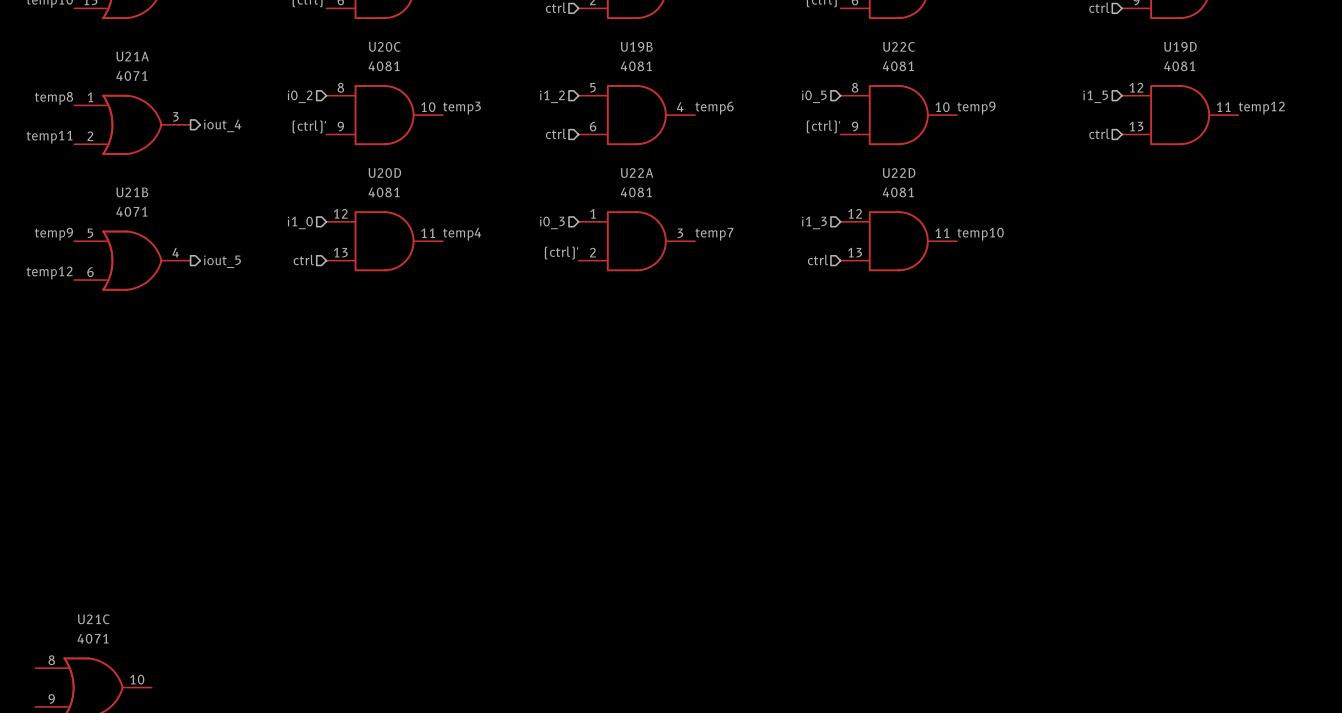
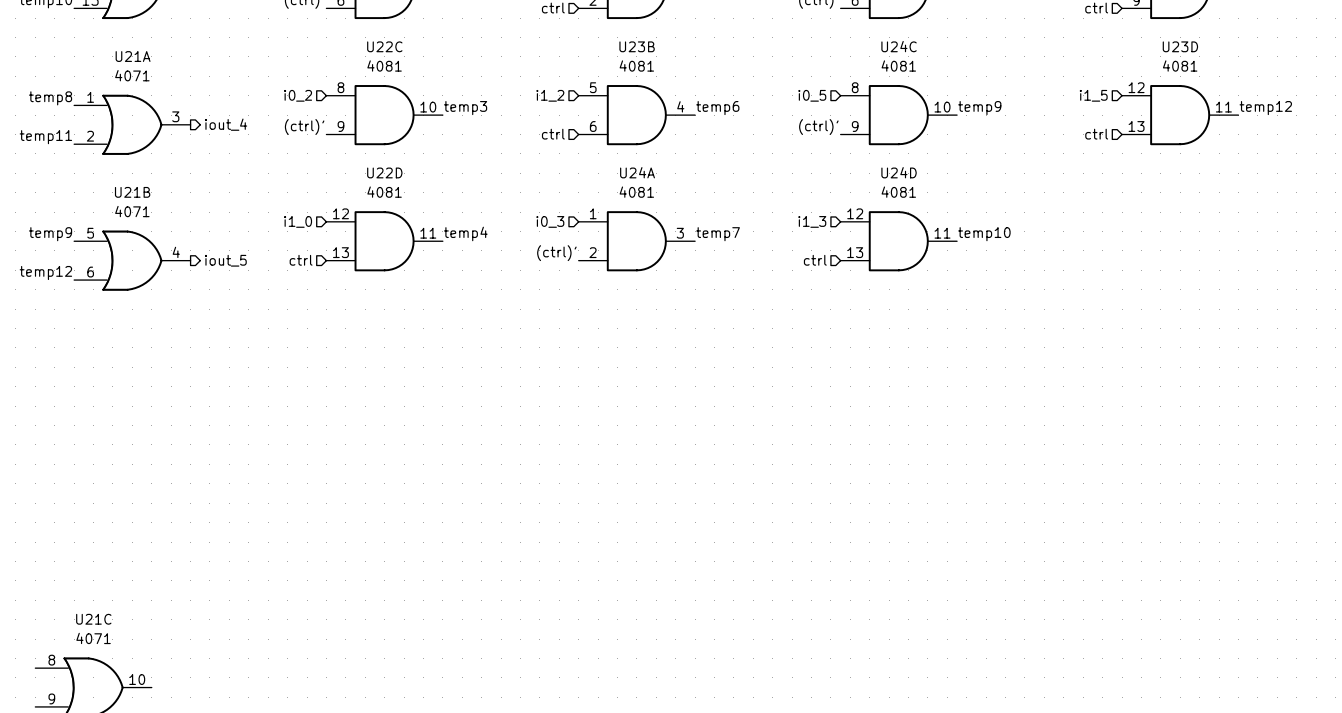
U20C name: U20C (384, 46) -> U22C (384, 46)
U19B name: U19B (636, 46) -> U23B (637, 46)
U22C name: U22C (899, 46) -> U24C (899, 46)
U19D name: U19D (1180, 46) -> U23D (1180, 46)
U20D name: U20D (384, 173) -> U22D (384, 172)
U22A name: U22A (637, 173) -> U24A (637, 172)
U22D name: U22D (899, 173) -> U24D (899, 172)

